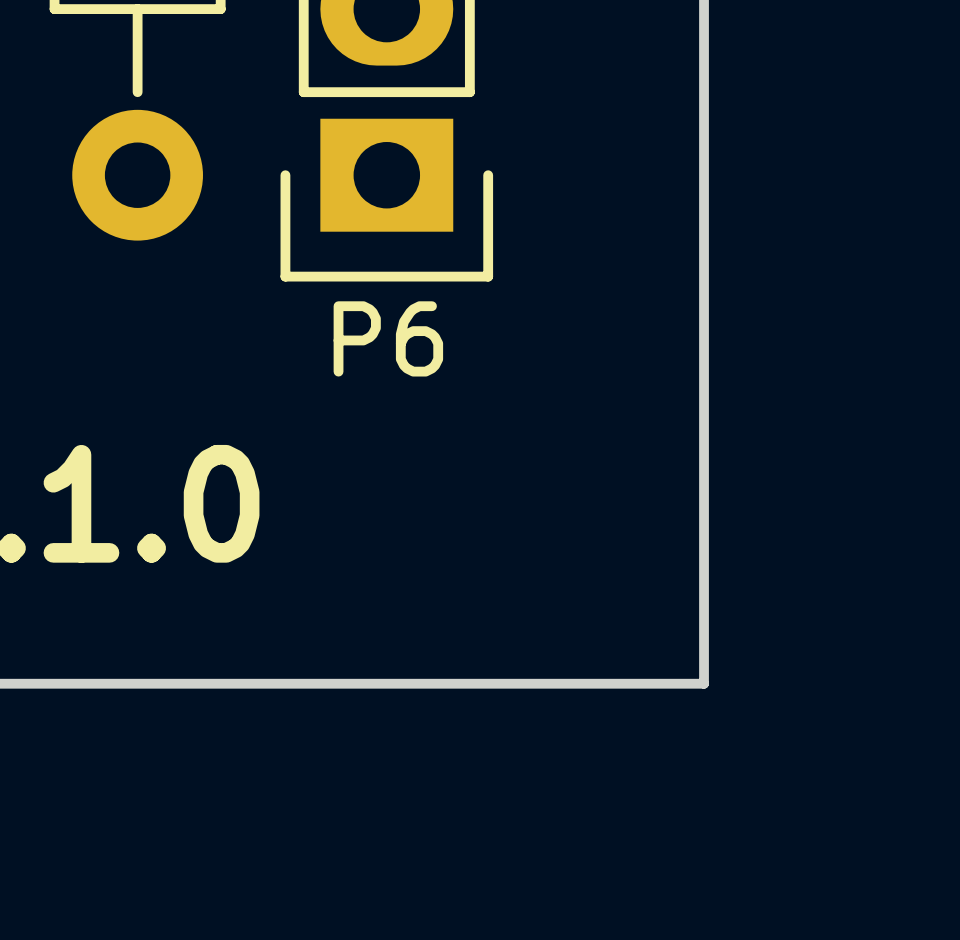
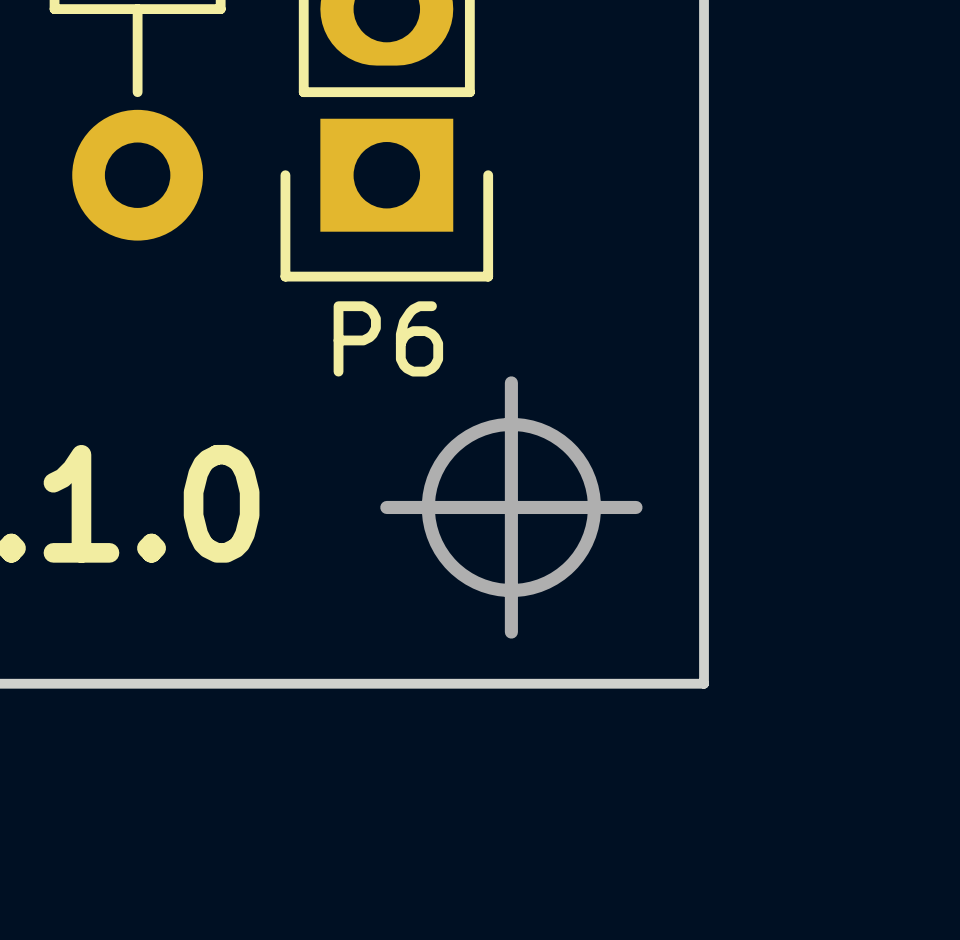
line: none -> (511, 382) (511, 632)
drawing: none -> [421, 417, 602, 598]
line: none -> (386, 507) (635, 507)

